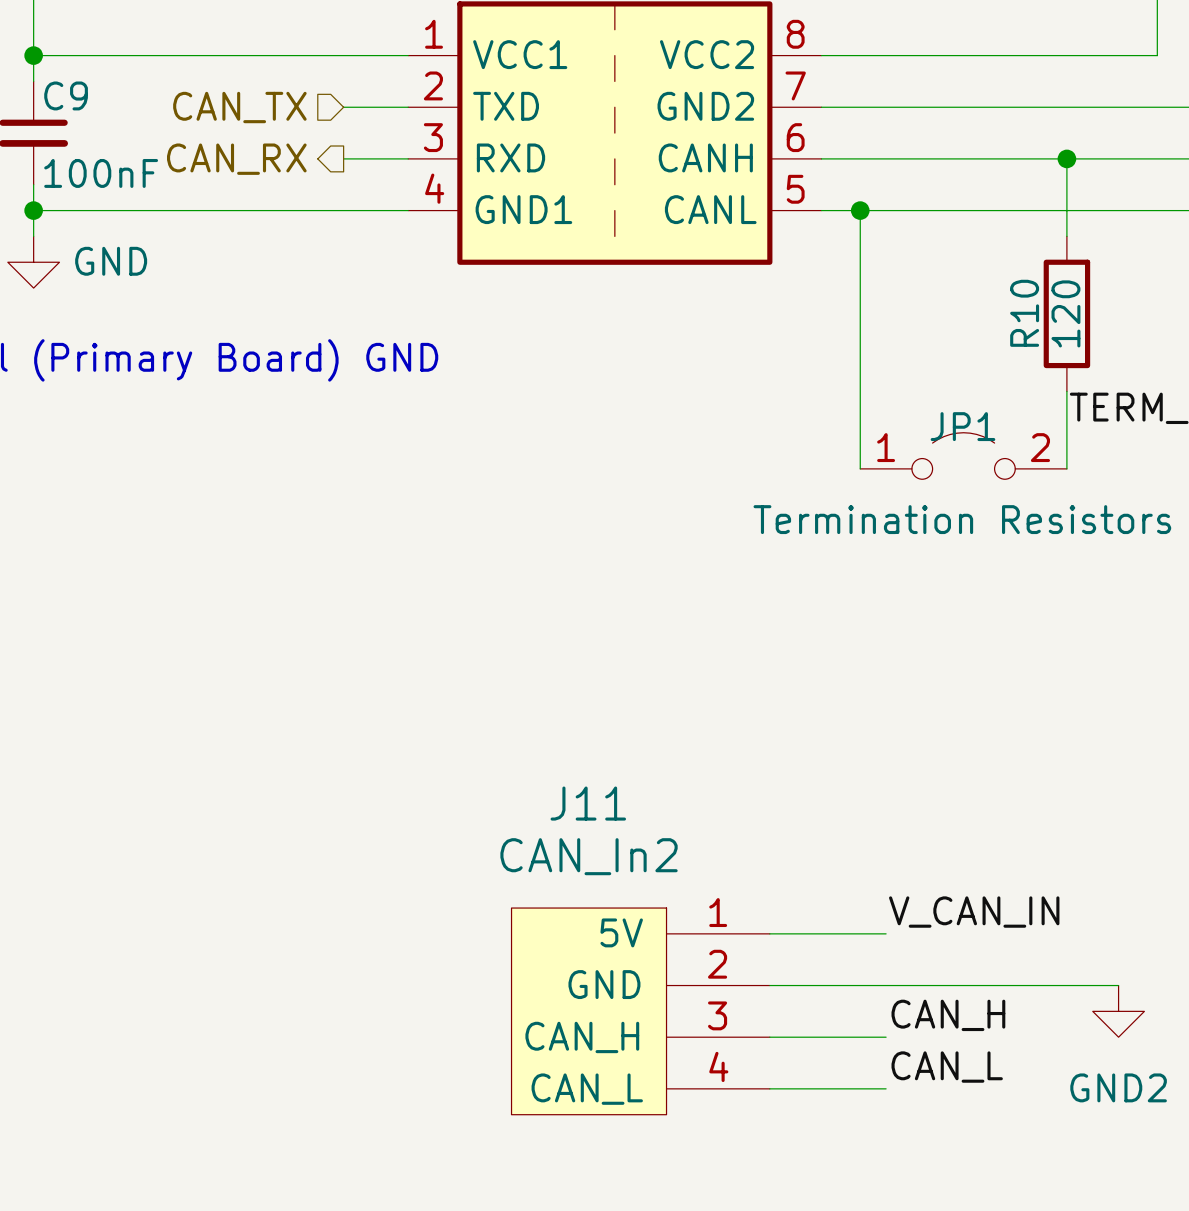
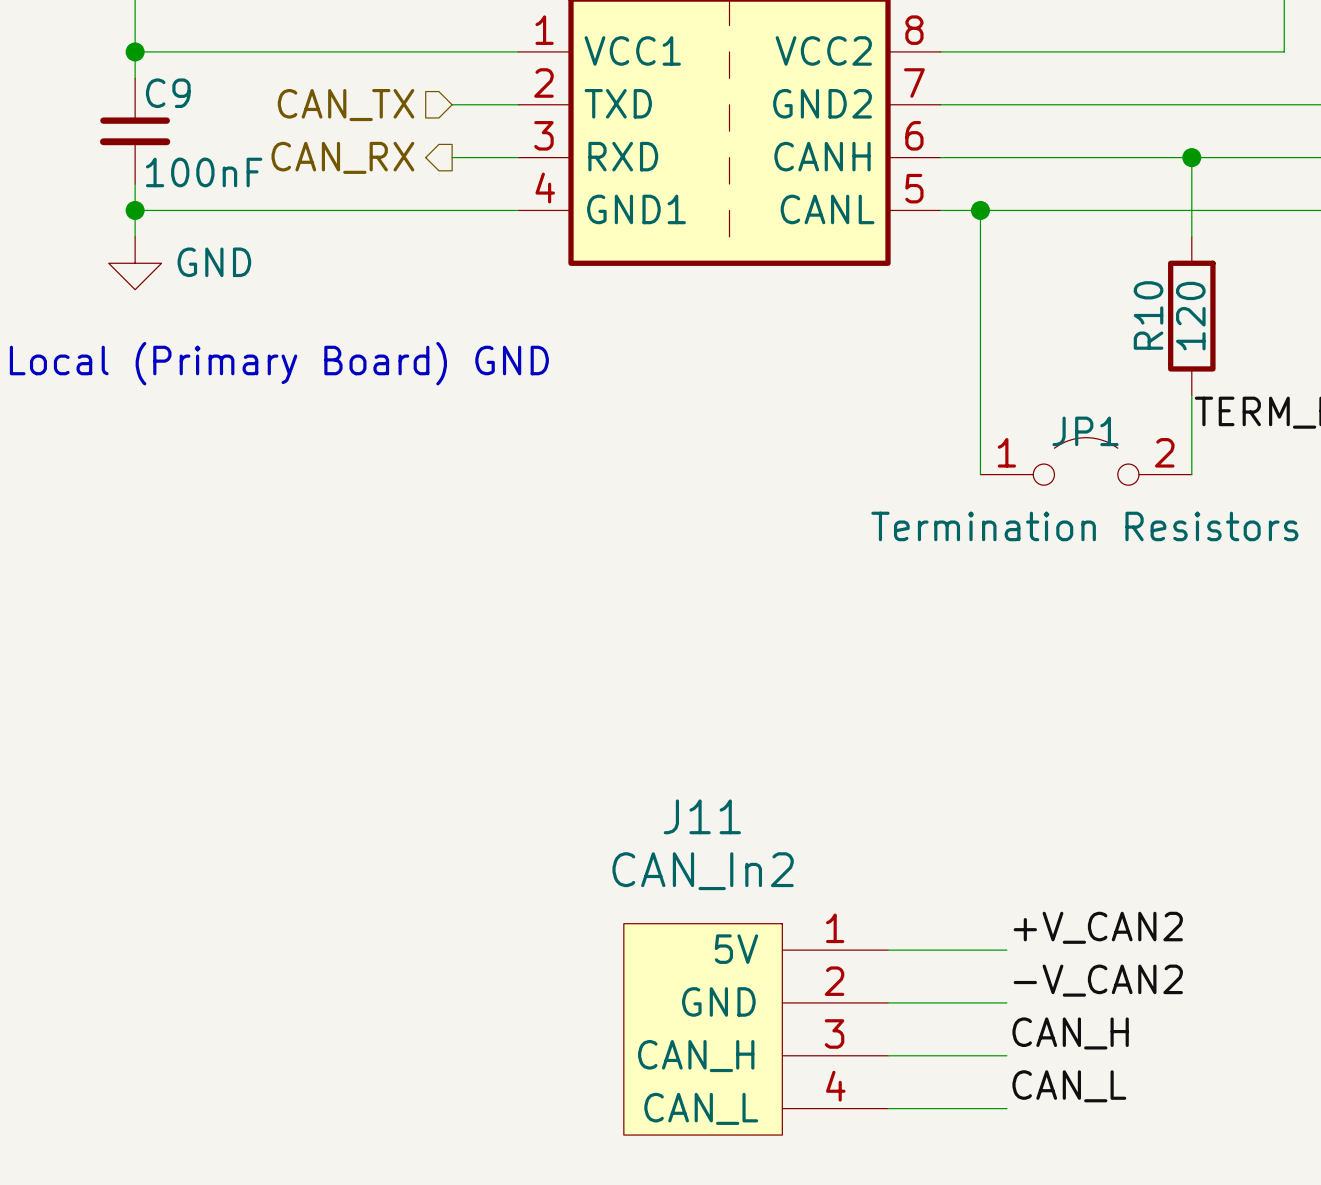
label: V_CAN_IN (974, 912) -> +V_CAN2 (1098, 927)
label: none -> -V_CAN2 (1098, 980)
wire: (886, 985) (1118, 985) -> none
power symbol: GND2 (1118, 1011) -> none

